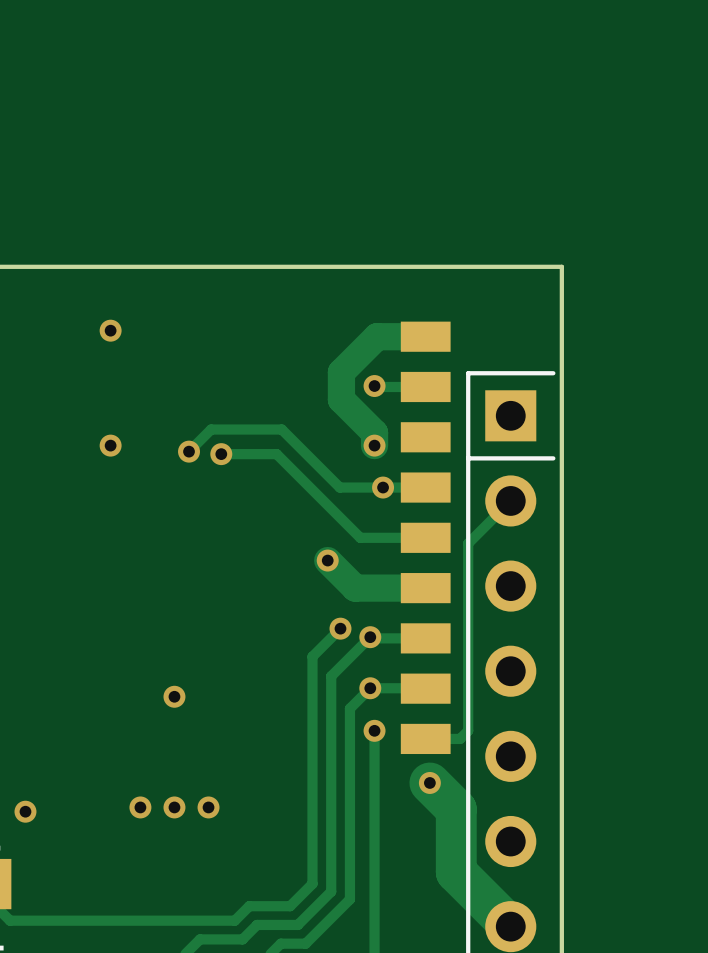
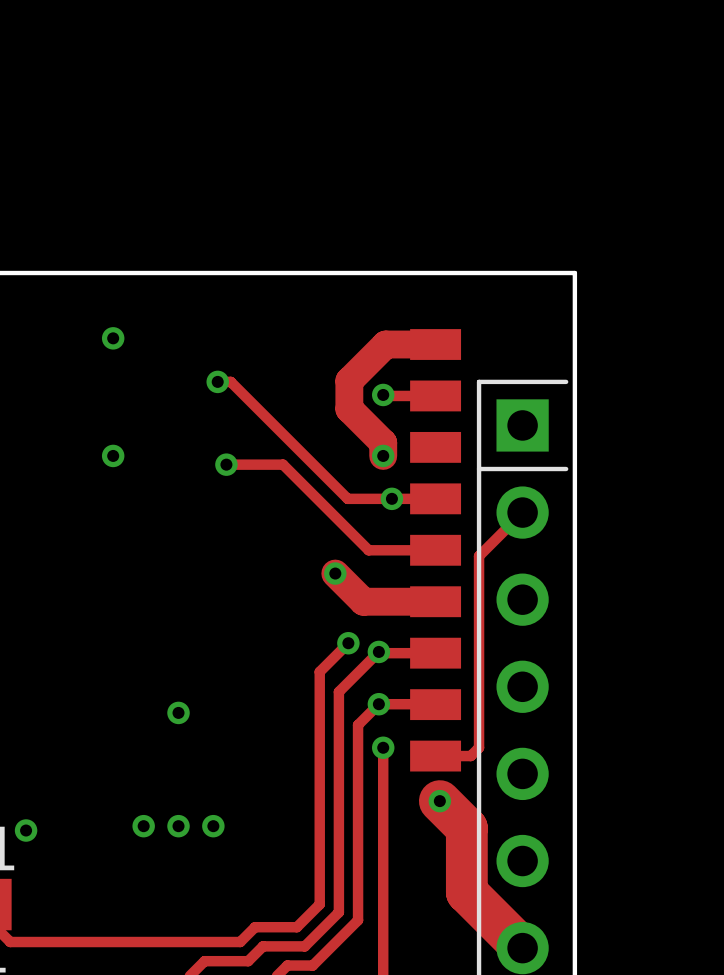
track: (281, 429) (211, 429) (189, 451) -> (288, 439) (230, 381) (217, 381)
via position: (189, 451) -> (217, 381)

